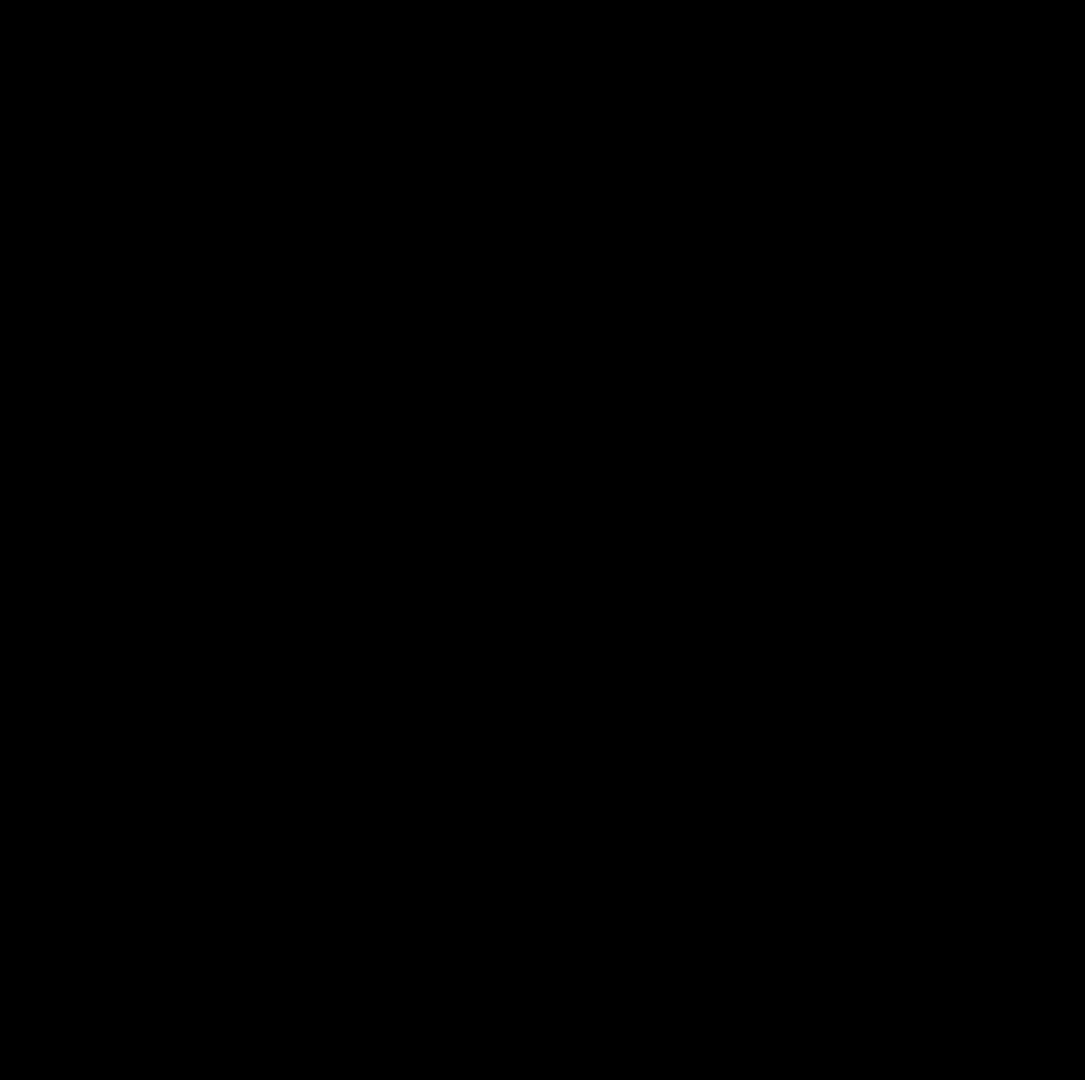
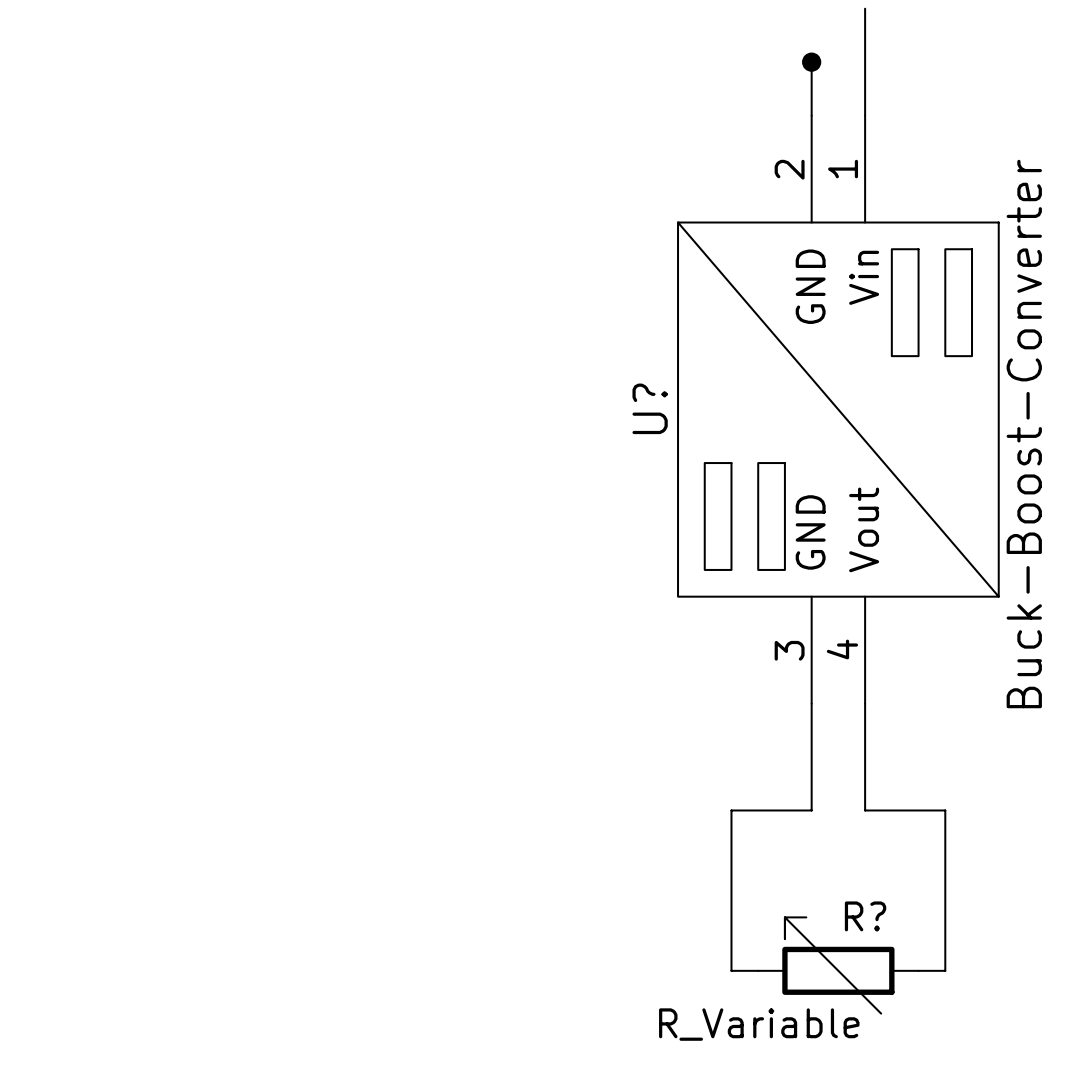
wire: none -> (865, 8) (865, 115)
wire: none -> (811, 62) (811, 115)
junction: none -> (811, 62)
U?: none -> Buck-Boost-Converter (838, 409)
wire: none -> (811, 703) (811, 810) (731, 810) (731, 970) (758, 970)
wire: none -> (865, 703) (865, 810) (945, 810) (945, 970) (918, 970)
R?: none -> R_Variable (838, 965)

